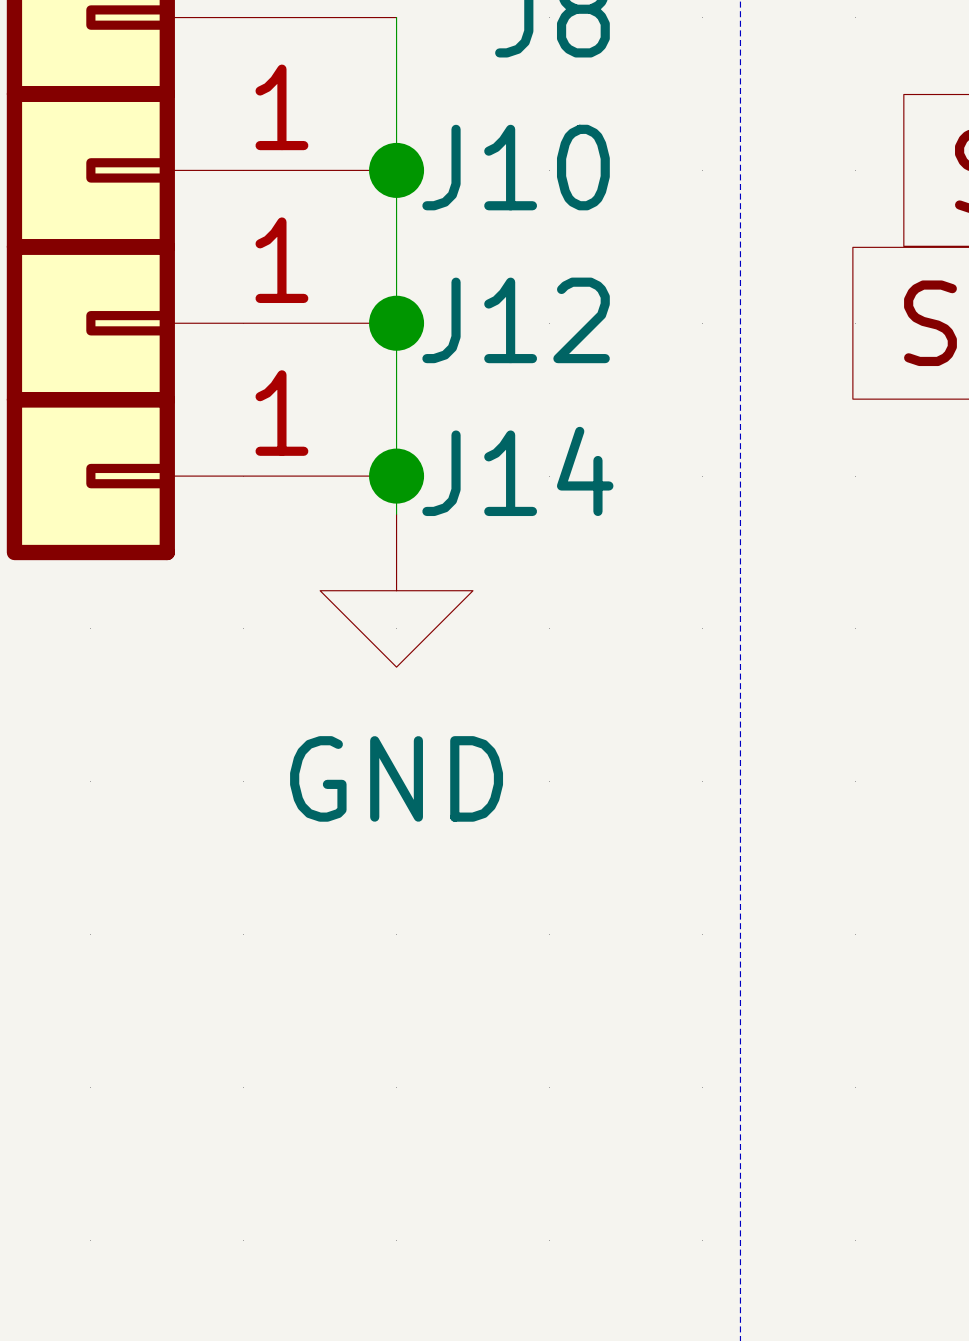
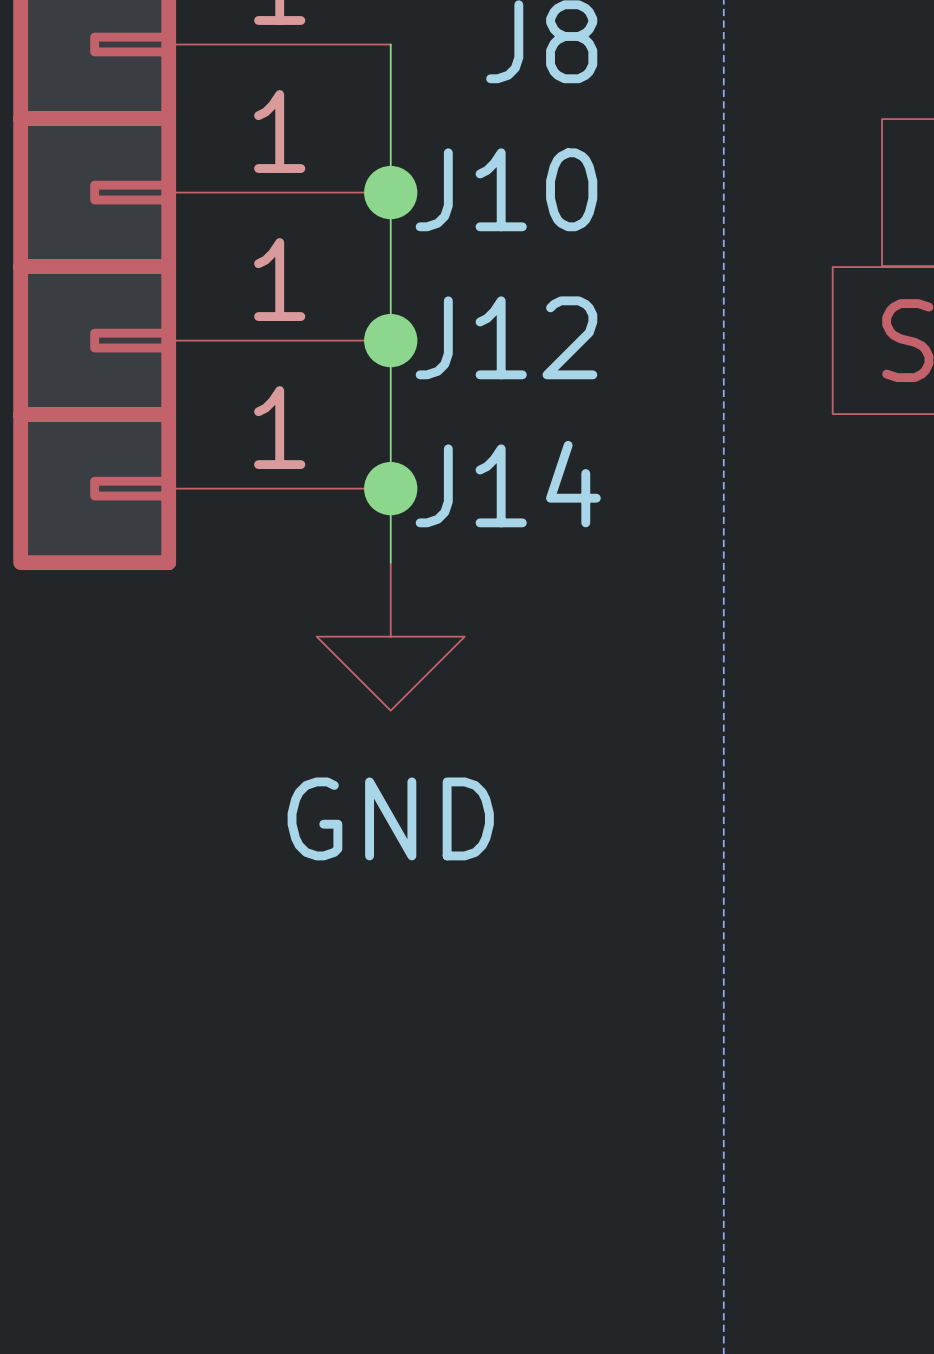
power symbol position: GND (396, 590) -> GND (390, 636)

